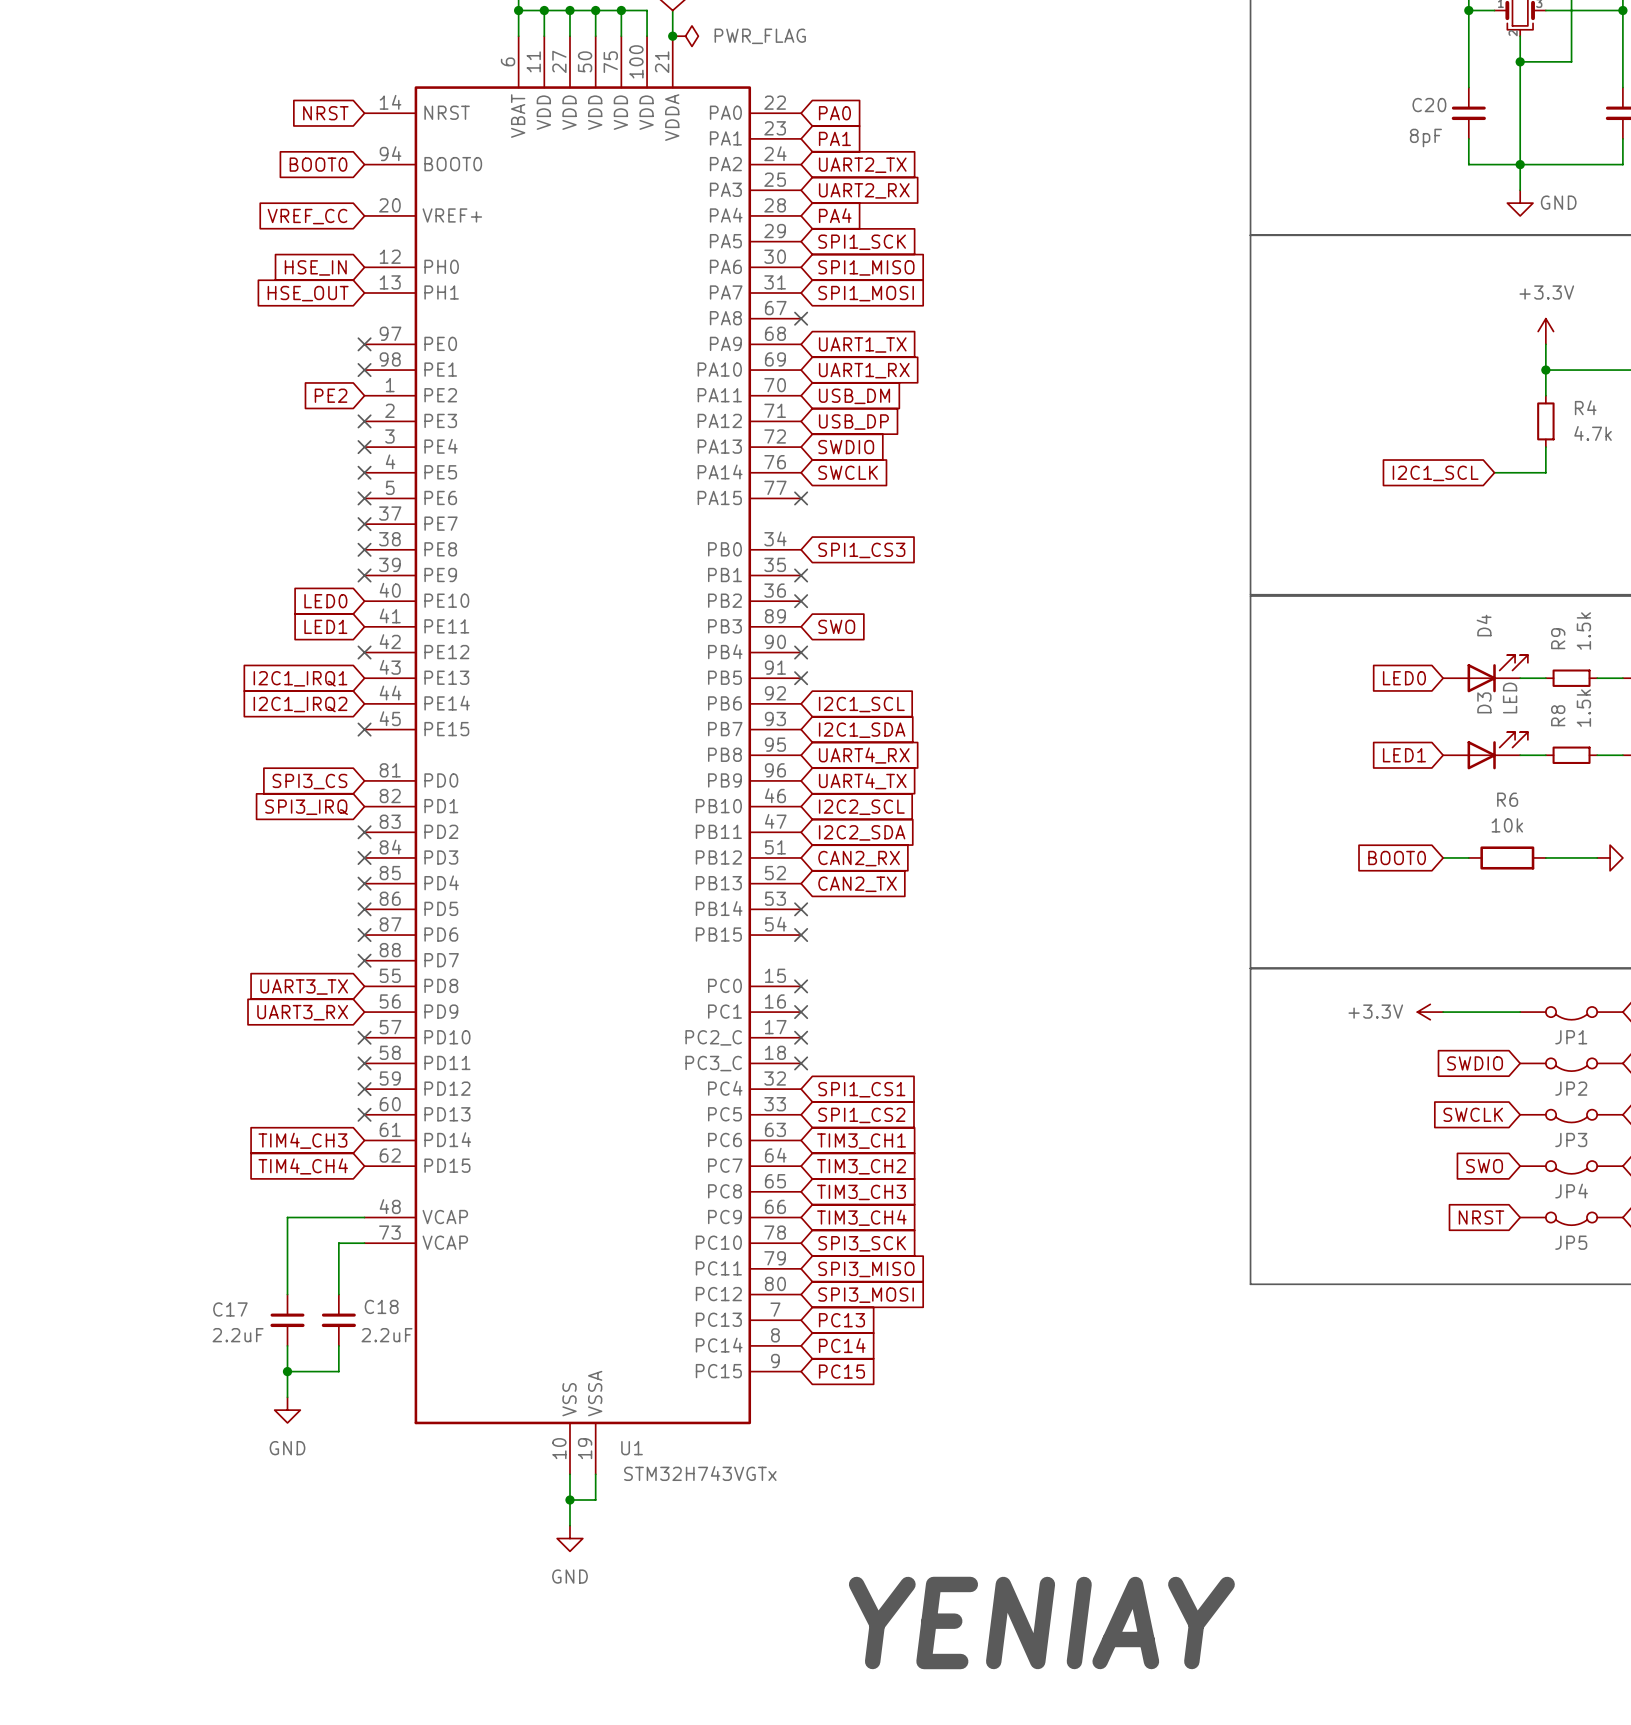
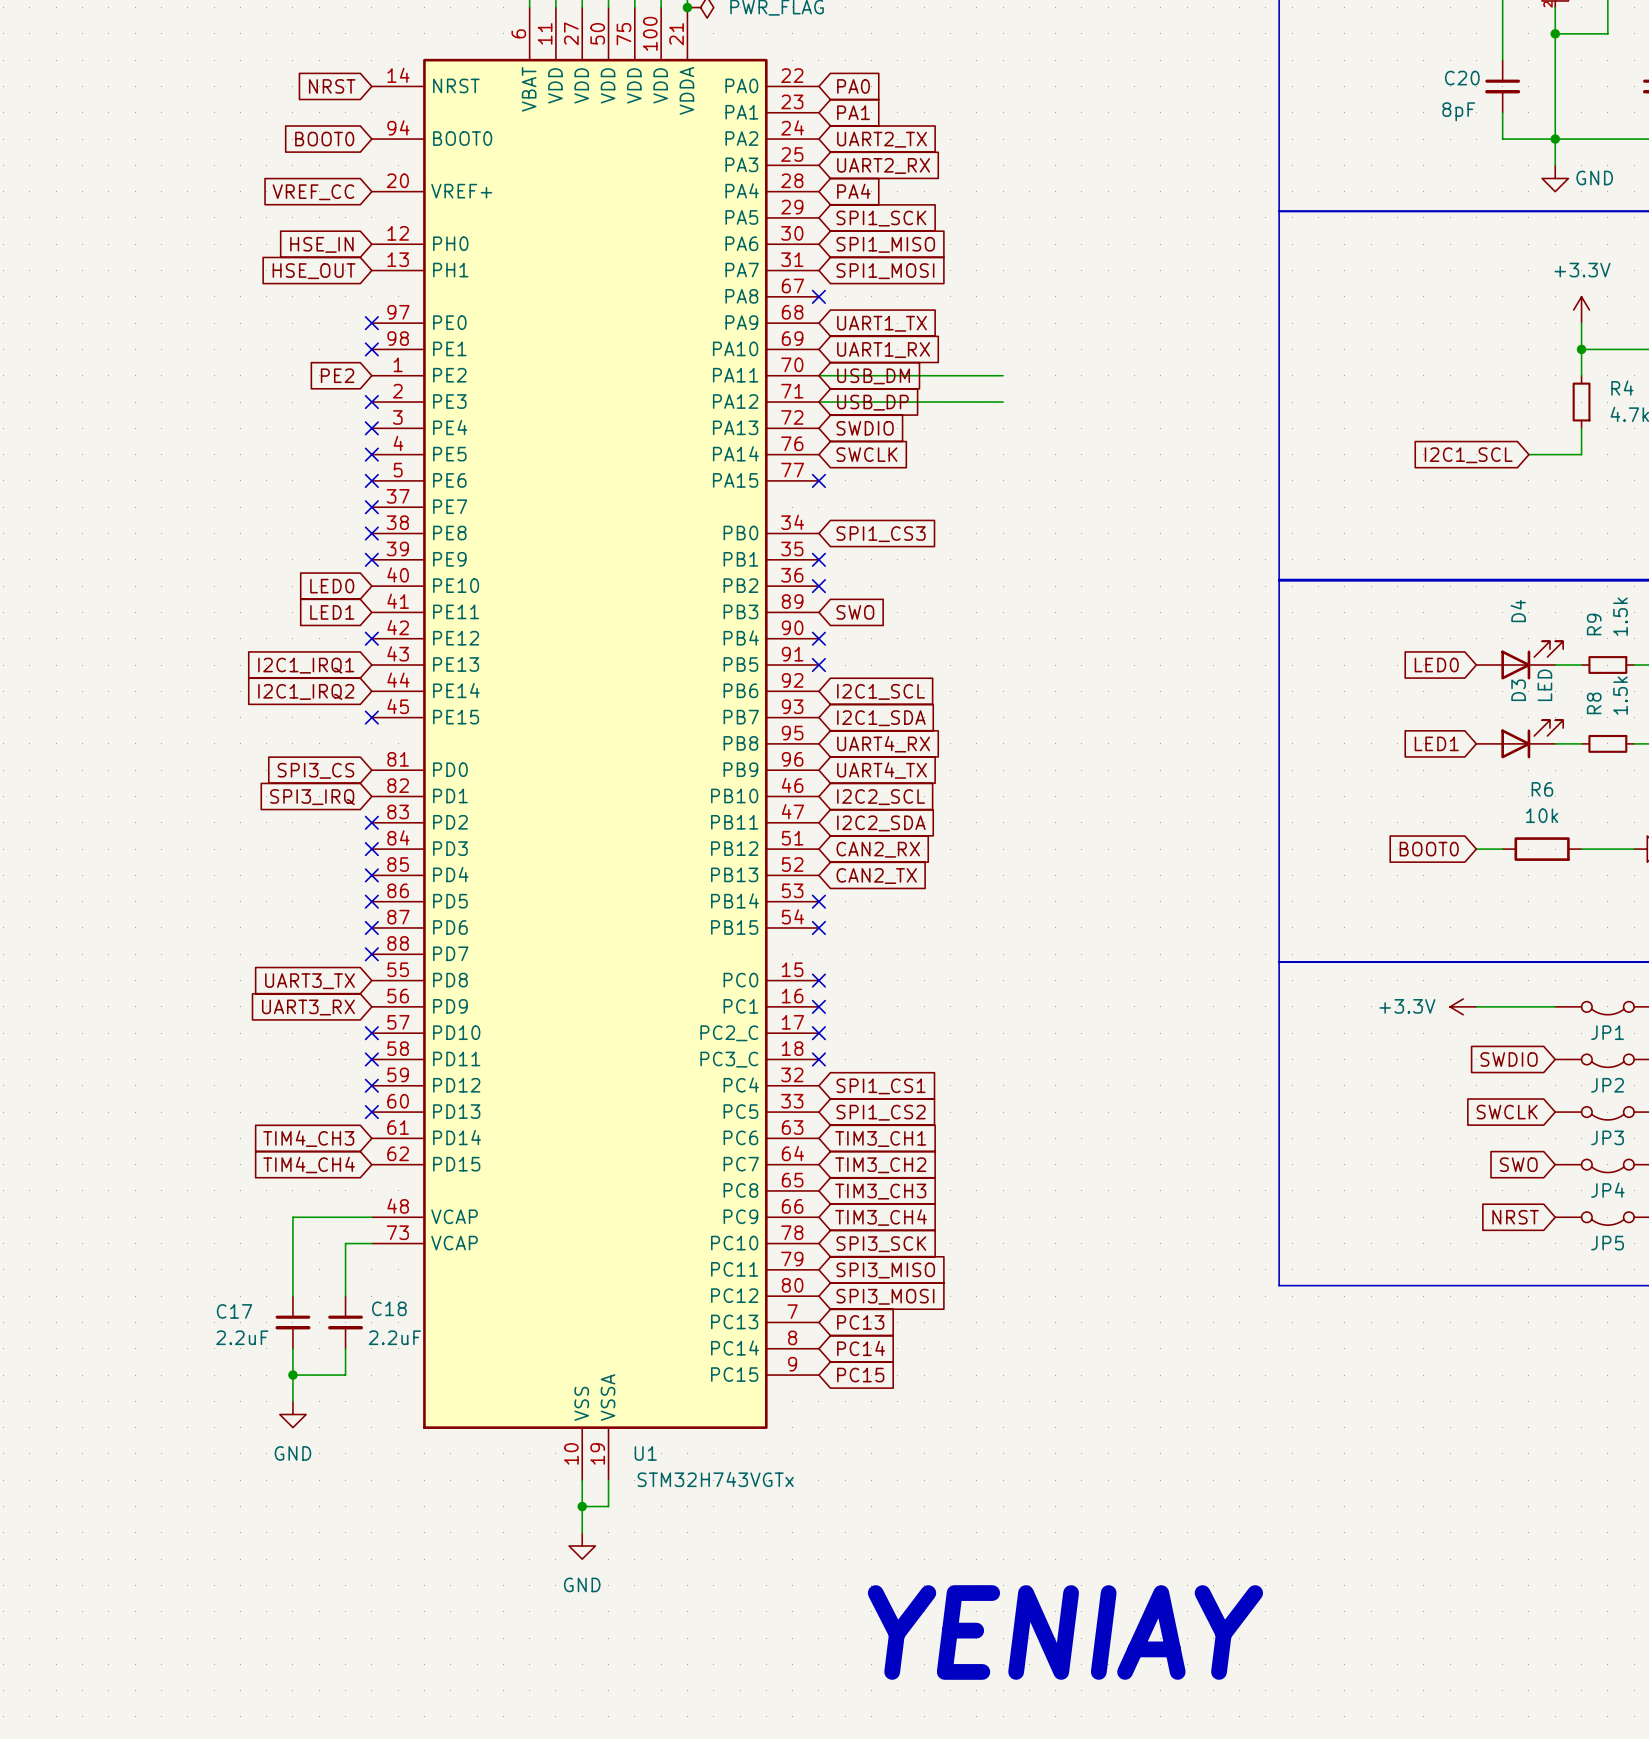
wire: none -> (818, 375) (1003, 375)
wire: none -> (818, 402) (1003, 402)

